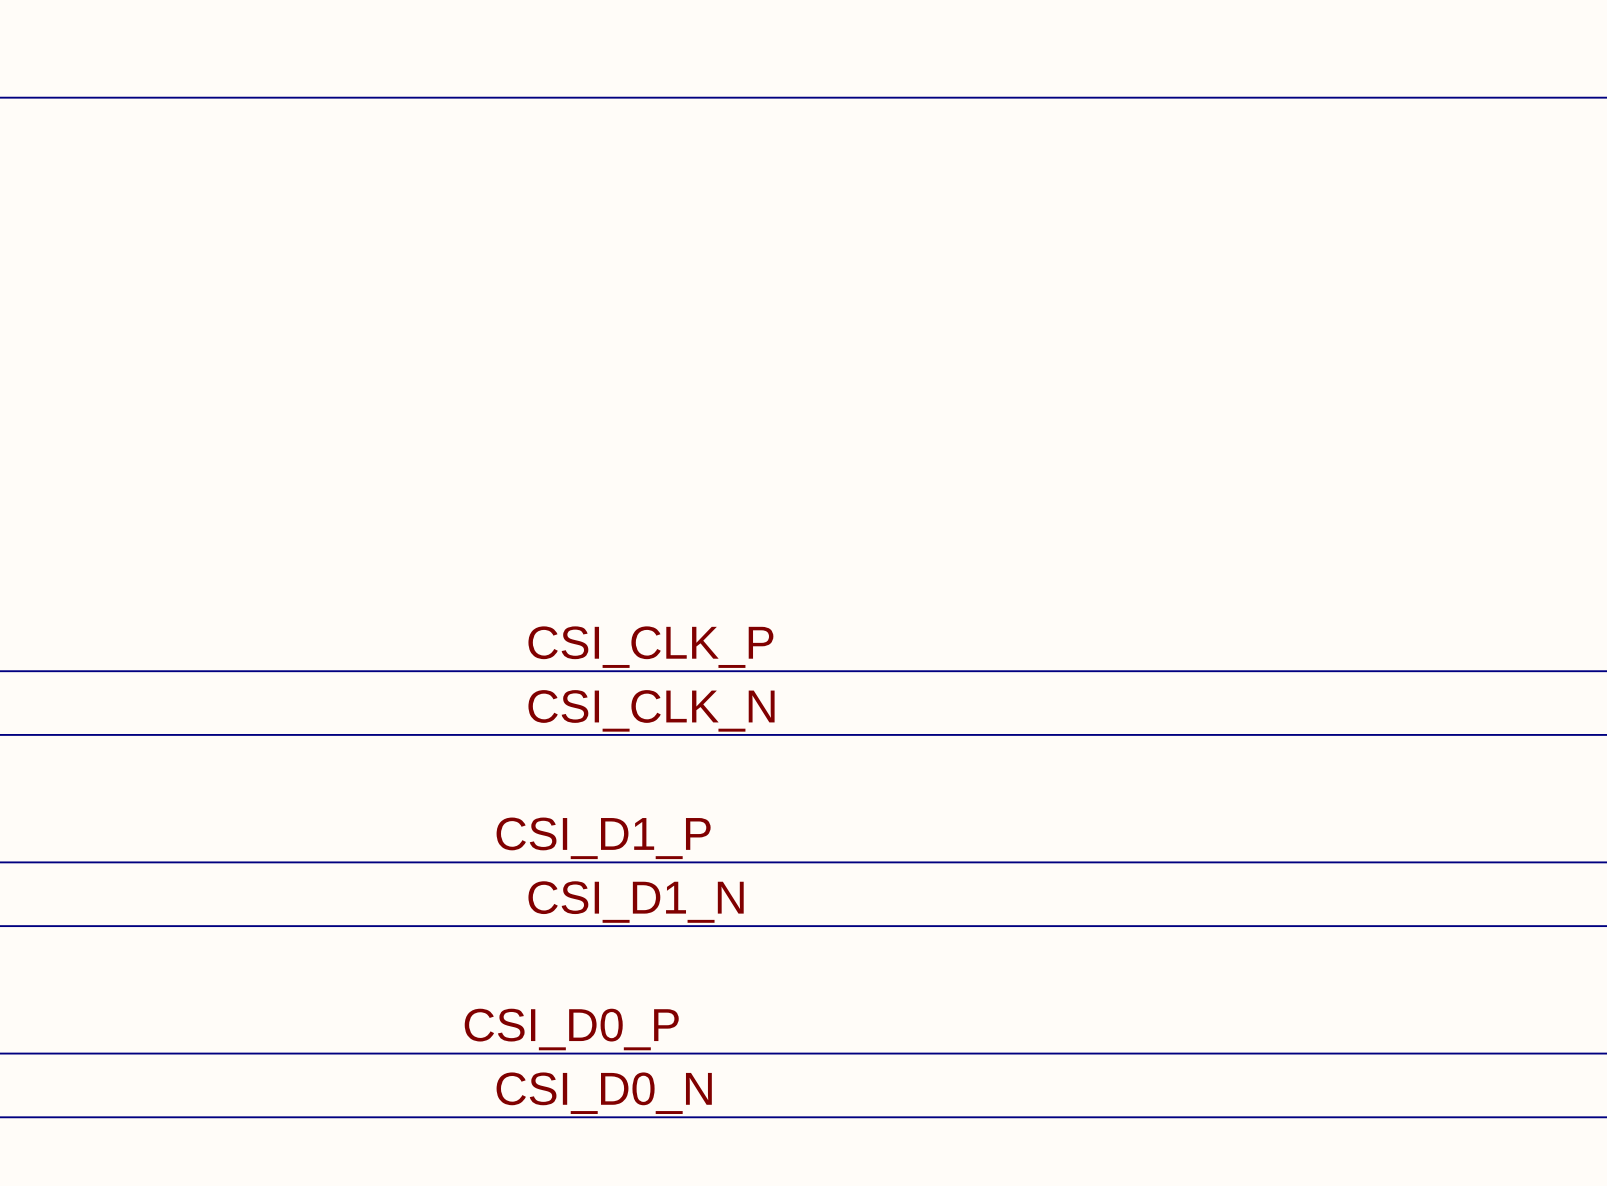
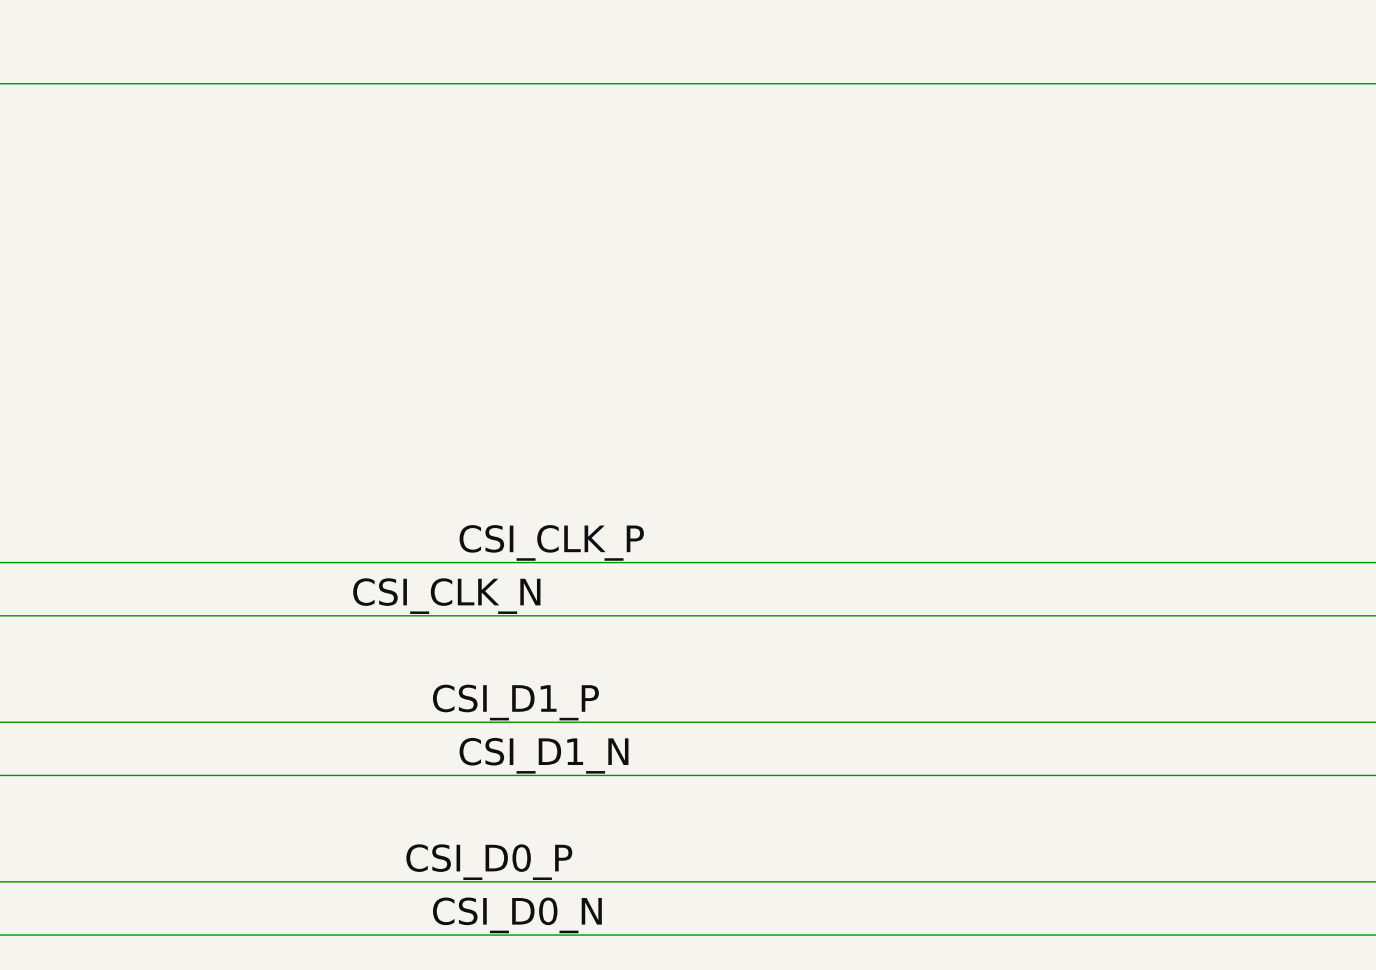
label position: CSI_CLK_N (651, 710) -> CSI_CLK_N (446, 596)

